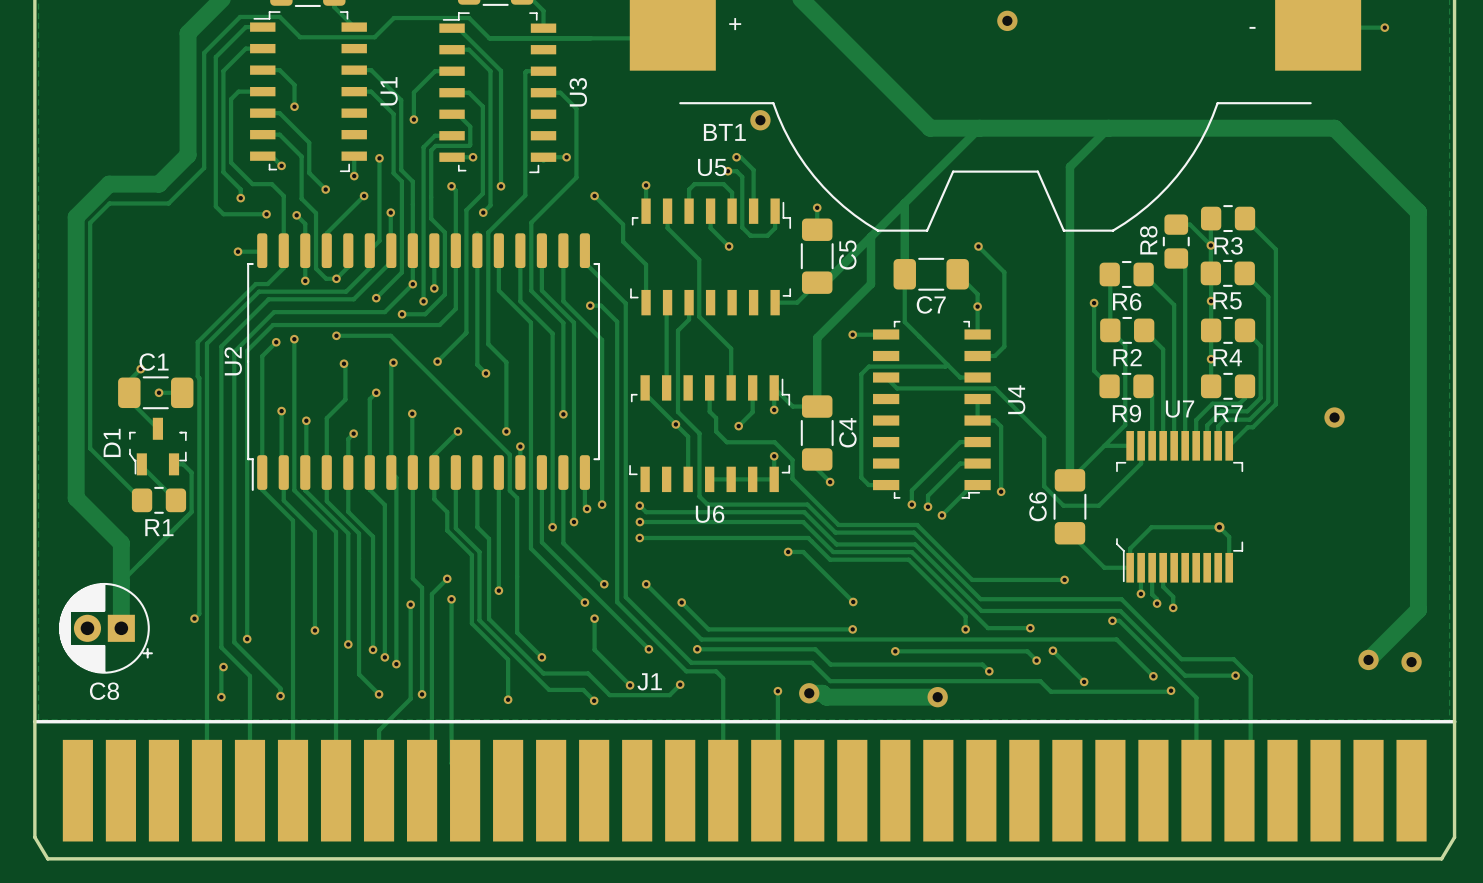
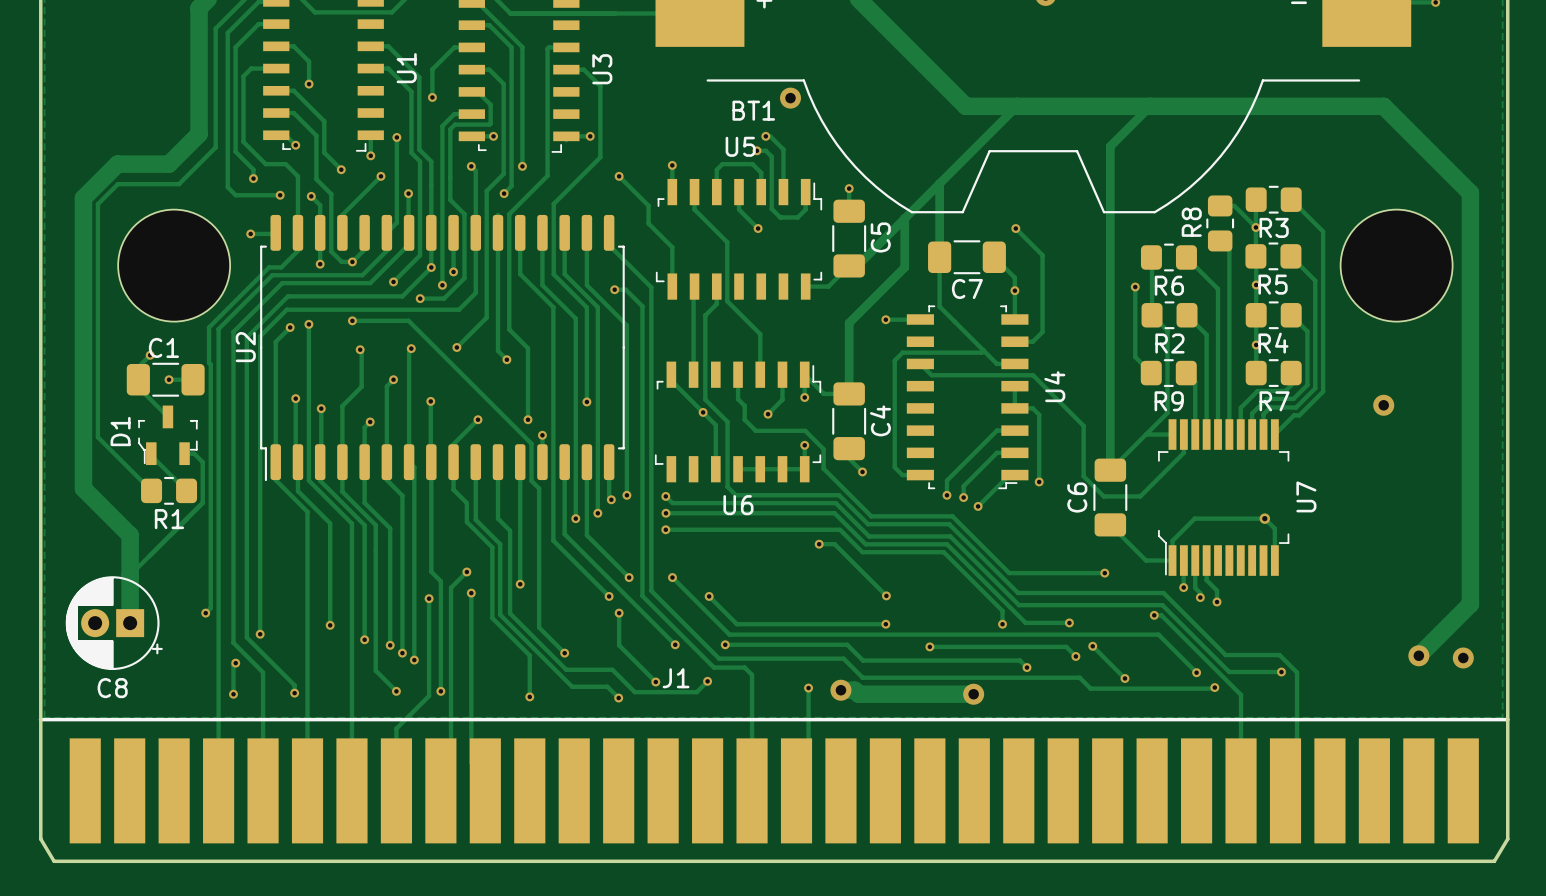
part: none -> (174, 265)
part: none -> (1396, 265)
U7 name rotation: 0° (1180, 409) -> 90° counterclockwise (1306, 496)
U7 name position: U7 (1180, 409) -> U7 (1306, 496)

